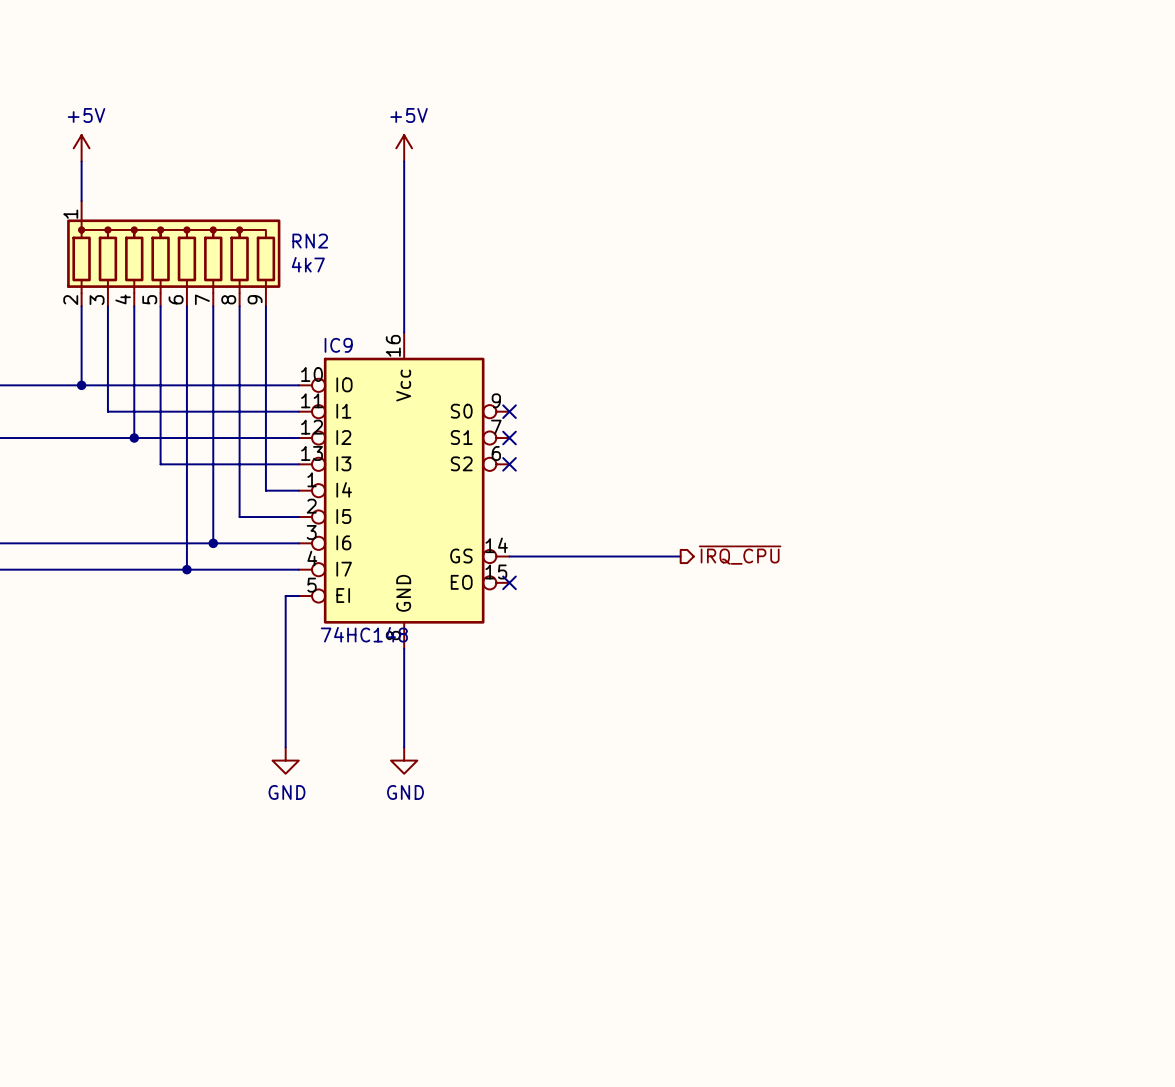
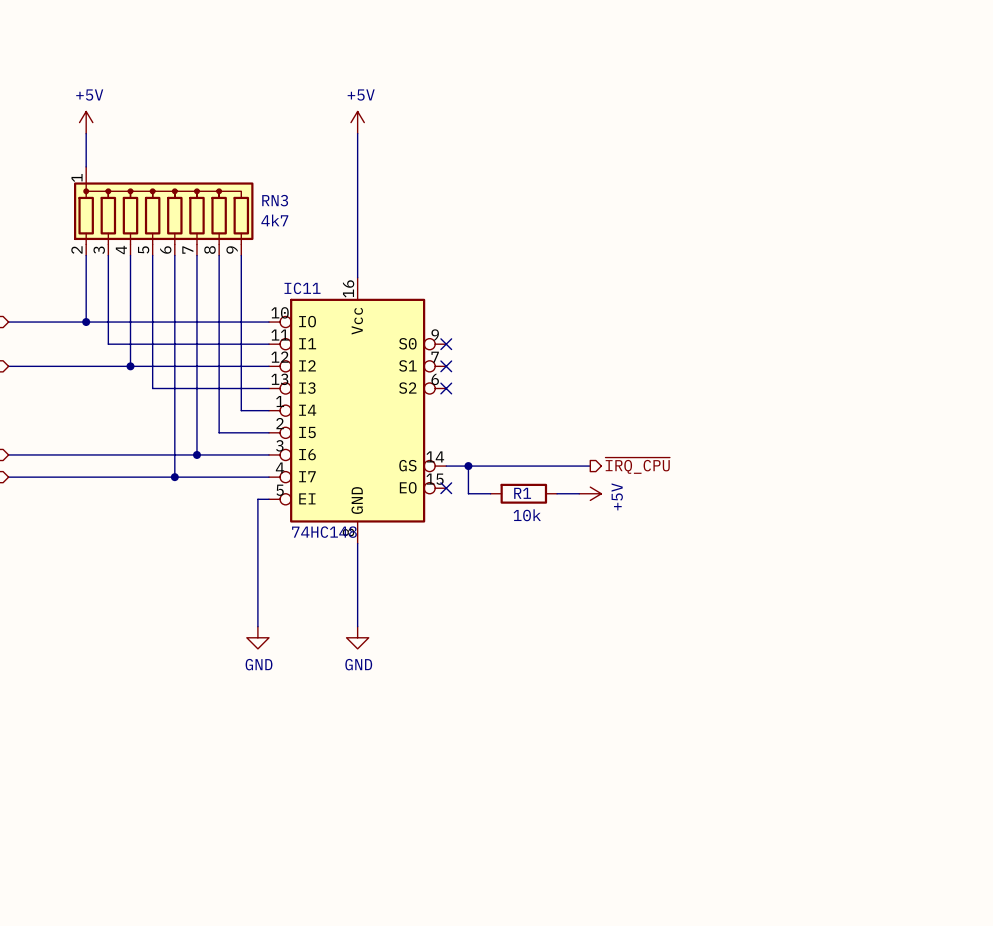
RN2 name: RN2 (310, 241) -> RN3 (275, 200)
IC9 name: IC9 (338, 345) -> IC11 (302, 288)
wire: none -> (468, 466) (468, 493) (490, 493)
junction: none -> (468, 466)
R1: none -> 10k (523, 493)
wire: none -> (557, 493) (579, 493)
power symbol: none -> +5V (590, 493)

